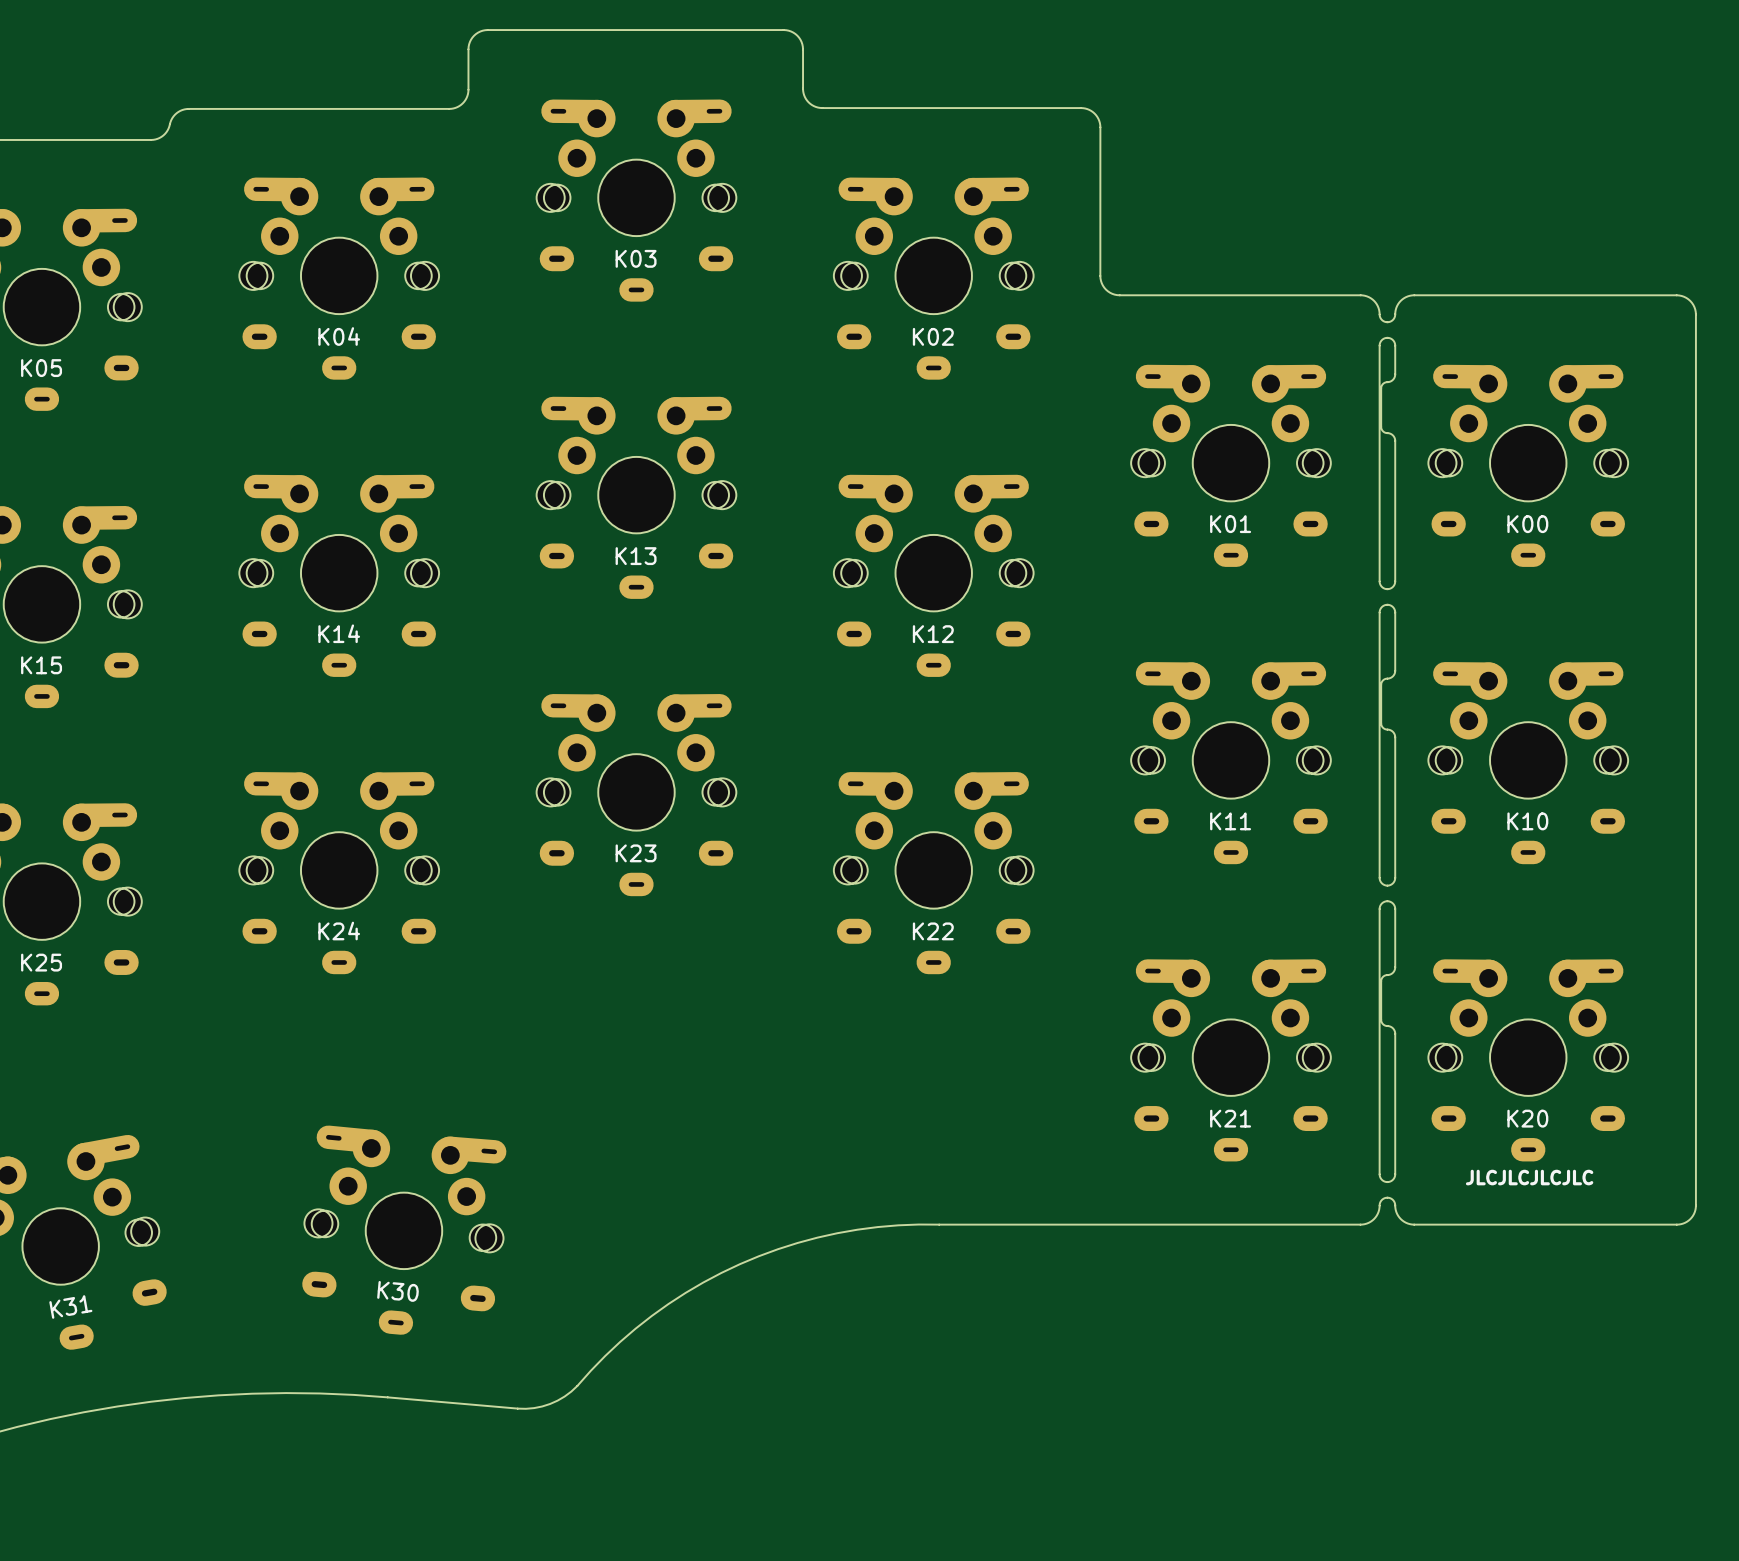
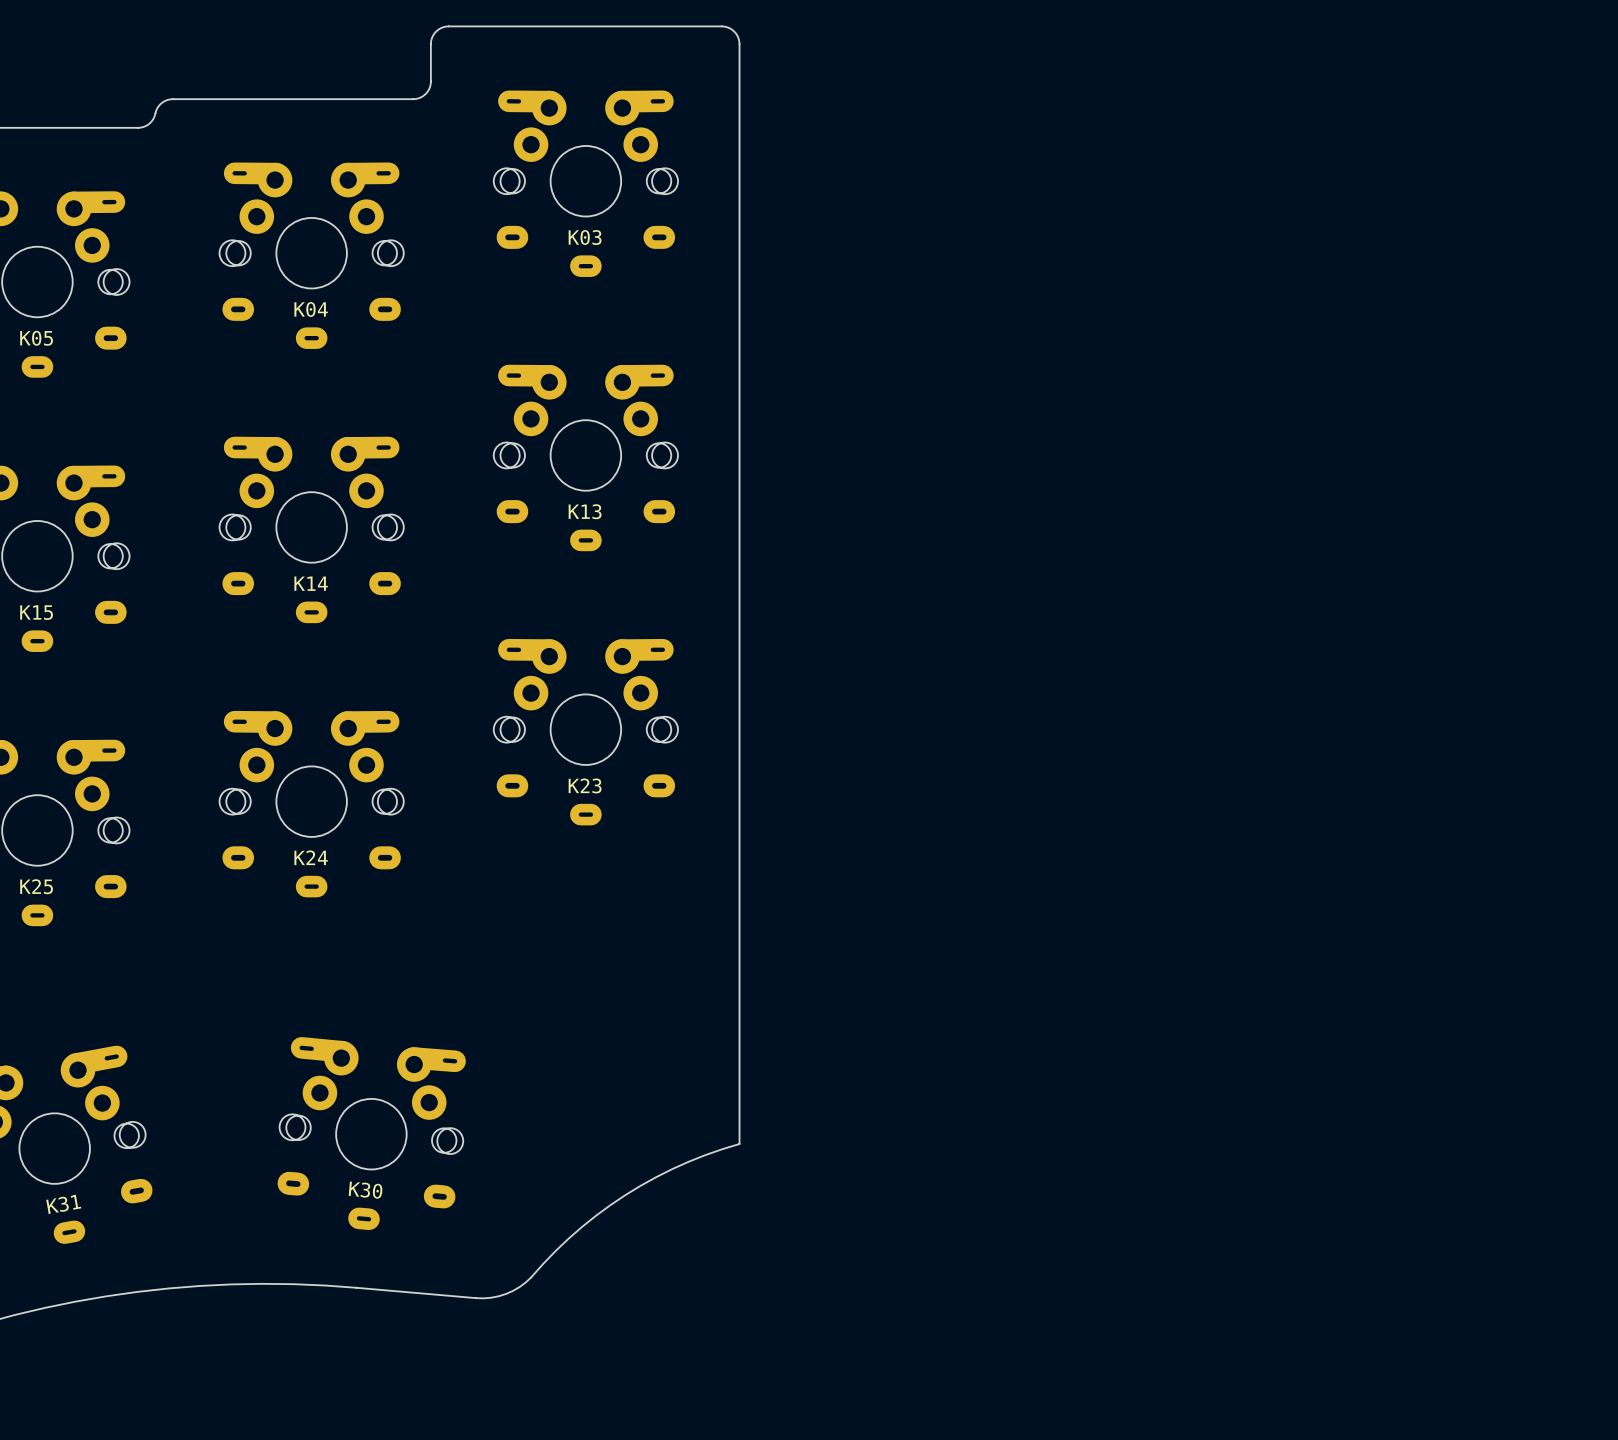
board edge: (803, 88) (807, 100) (820, 107) (1080, 108) (1091, 110) (1097, 117) (1100, 127) (1100, 278) (1104, 287) (1114, 294) (1362, 295) (1374, 300) (1378, 308) (1380, 318) (1387, 322) (1394, 318) (1396, 307) (1400, 300) (1412, 295) (1676, 295) (1686, 297) (1691, 302) (1695, 314) (1695, 1209) (1690, 1219) (1678, 1224) (1414, 1224) (1400, 1219) (1396, 1211) (1394, 1201) (1387, 1197) (1380, 1201) (1378, 1211) (1374, 1219) (1362, 1224) (918, 1224) (857, 1229) (817, 1237) (778, 1249) (739, 1264) (703, 1282) (668, 1304) (635, 1328) (605, 1355) (577, 1385) -> (739, 80) (739, 1143) (705, 1155) (672, 1169) (625, 1195) (582, 1226) (555, 1250) (531, 1277)
K02: (933, 278) -> none
board edge: (1387, 337) (1381, 340) (1379, 345) (1379, 581) (1381, 586) (1387, 589) (1392, 586) (1395, 581) (1395, 440) (1392, 434) (1383, 431) (1381, 426) (1381, 387) (1384, 383) (1392, 380) (1395, 375) (1395, 343) (1392, 339) (1387, 337) -> none
K01: (1230, 465) -> none
K00: (1528, 465) -> none
K12: (933, 575) -> none
board edge: (1387, 604) (1381, 607) (1379, 612) (1379, 877) (1381, 883) (1387, 885) (1392, 883) (1395, 877) (1395, 736) (1392, 731) (1383, 727) (1381, 723) (1381, 683) (1384, 679) (1392, 676) (1395, 670) (1395, 611) (1392, 606) (1387, 604) -> none
K11: (1230, 763) -> none
K10: (1528, 763) -> none
K22: (933, 873) -> none
board edge: (1387, 901) (1381, 903) (1379, 909) (1379, 1174) (1381, 1179) (1387, 1182) (1392, 1179) (1395, 1174) (1395, 1032) (1392, 1027) (1383, 1024) (1381, 1019) (1381, 979) (1384, 976) (1392, 972) (1395, 967) (1395, 908) (1392, 903) (1387, 901) -> none
K21: (1230, 1060) -> none
K20: (1528, 1060) -> none
text: JLCJLCJLCJLC (1529, 1177) -> none

